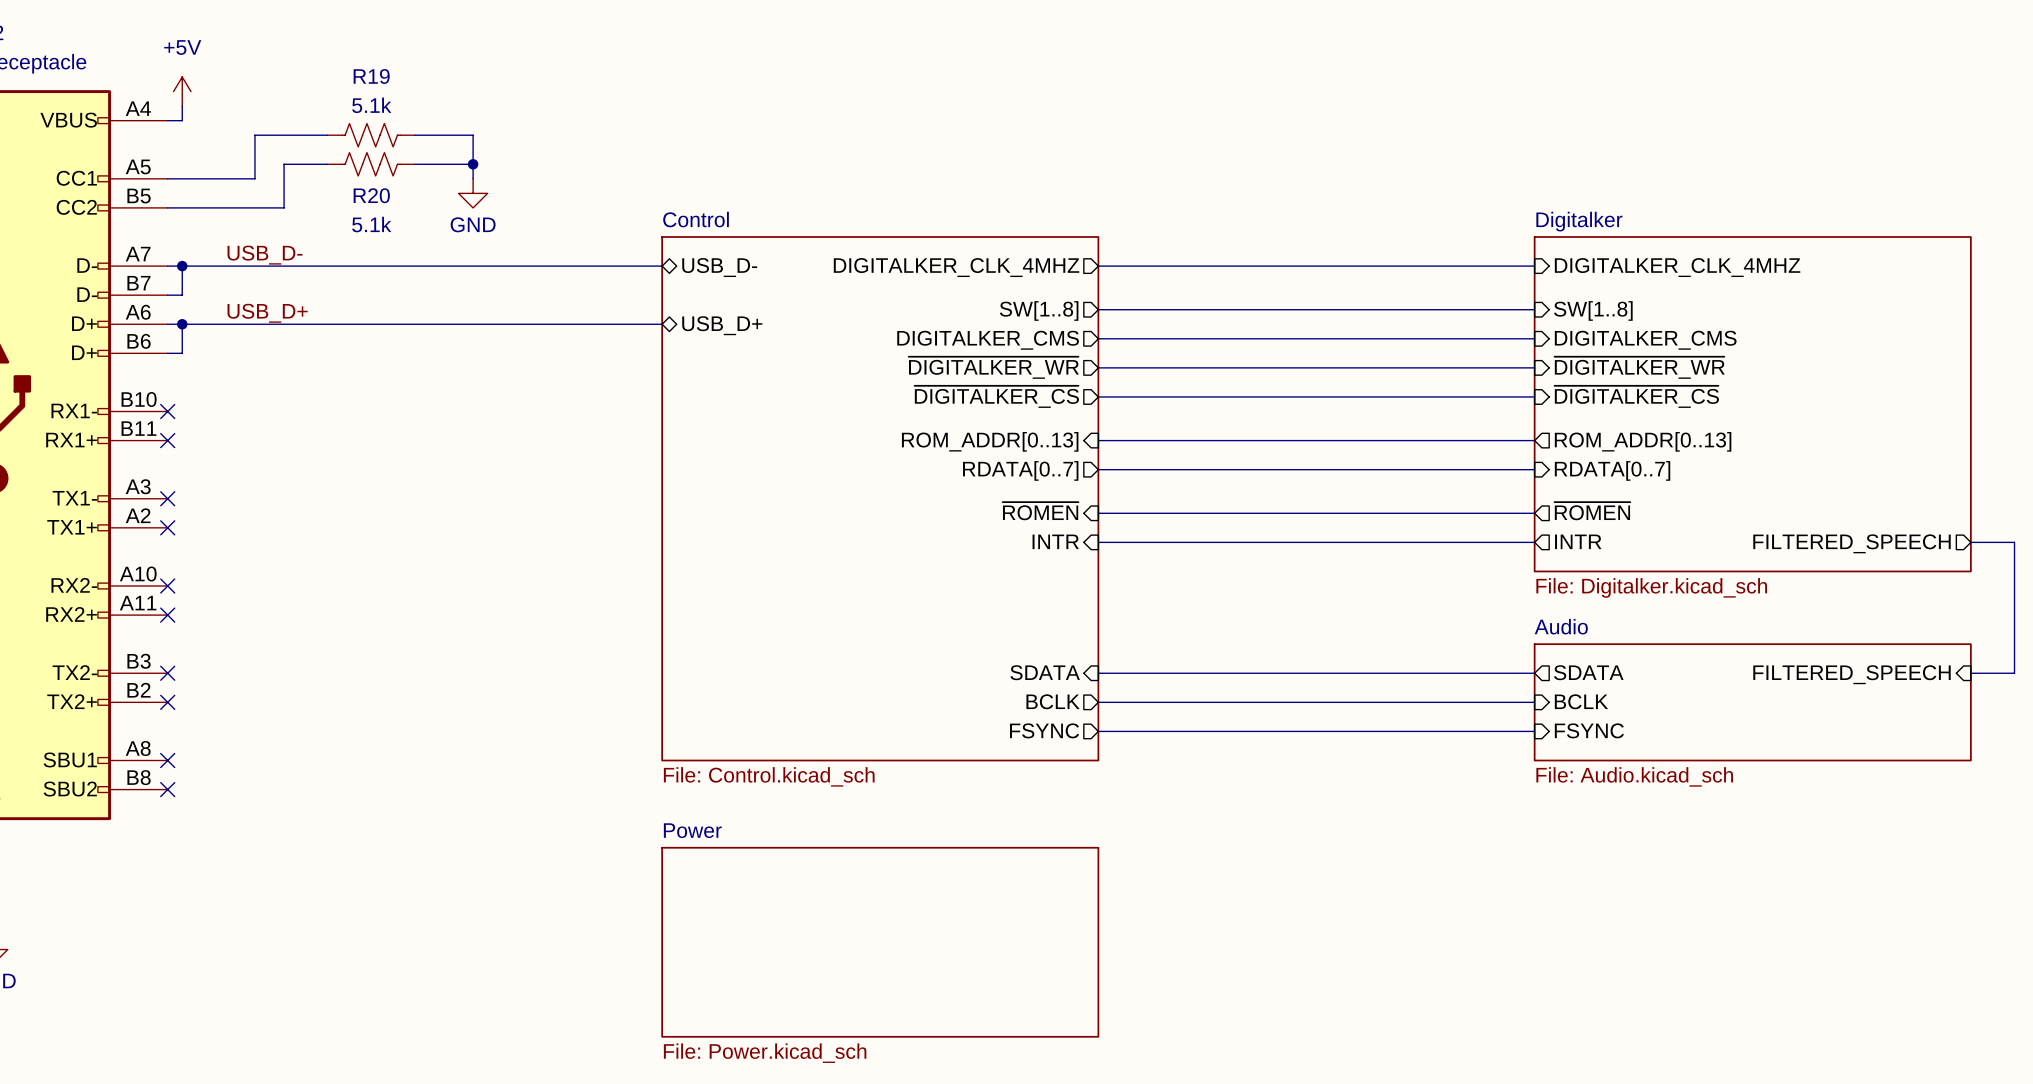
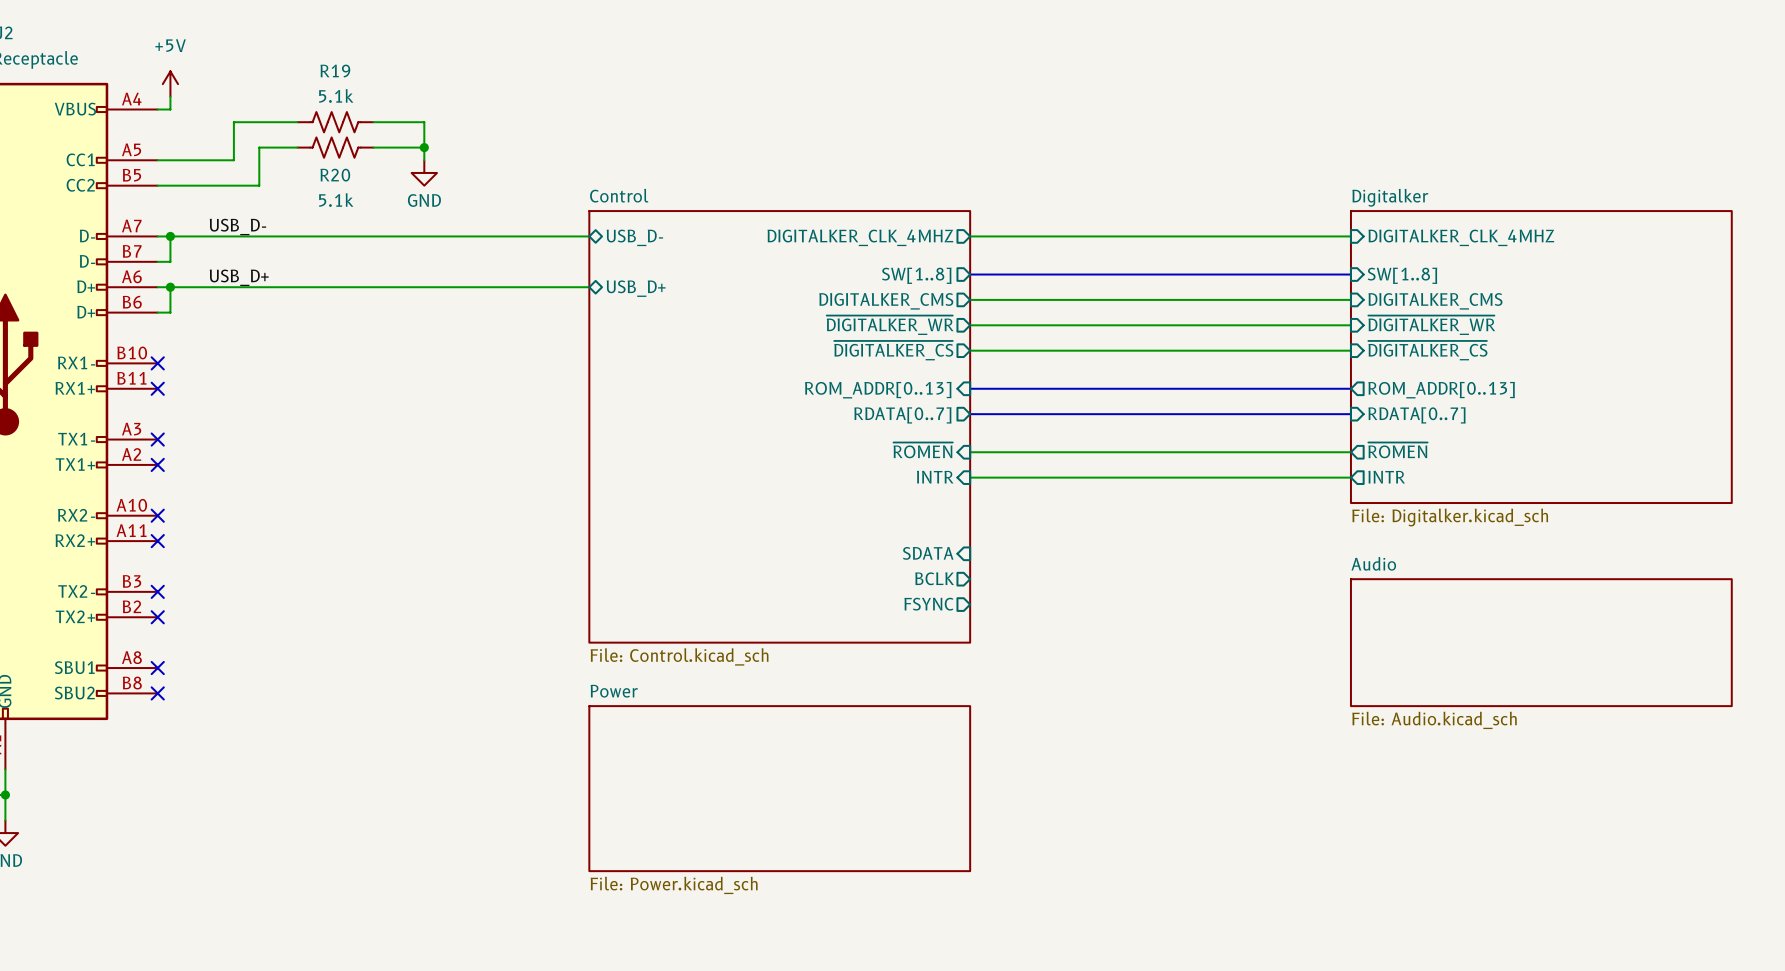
sheet Control: none -> File: Control.kicad_sch (779, 426)
sheet Control: File: Control.kicad_sch (880, 498) -> none
wire: (1970, 542) (2014, 542) (2014, 673) (1970, 673) -> none
sheet pin: FILTERED_SPEECH (1852, 543) -> none
sheet pin position: SDATA (1045, 672) -> SDATA (928, 553)
sheet pin: SDATA (1588, 672) -> none
wire: (1098, 673) (1534, 673) -> none
sheet pin: FILTERED_SPEECH (1852, 674) -> none
sheet pin position: BCLK (1053, 701) -> BCLK (934, 578)
sheet pin: BCLK (1581, 701) -> none
wire: (1098, 702) (1534, 702) -> none
sheet Audio: File: Audio.kicad_sch (1752, 702) -> none
sheet pin position: FSYNC (1044, 730) -> FSYNC (928, 604)
sheet pin: FSYNC (1589, 730) -> none
wire: (1098, 731) (1534, 731) -> none
sheet Audio: none -> File: Audio.kicad_sch (1541, 642)
sheet Power position: (880, 942) -> (779, 788)

